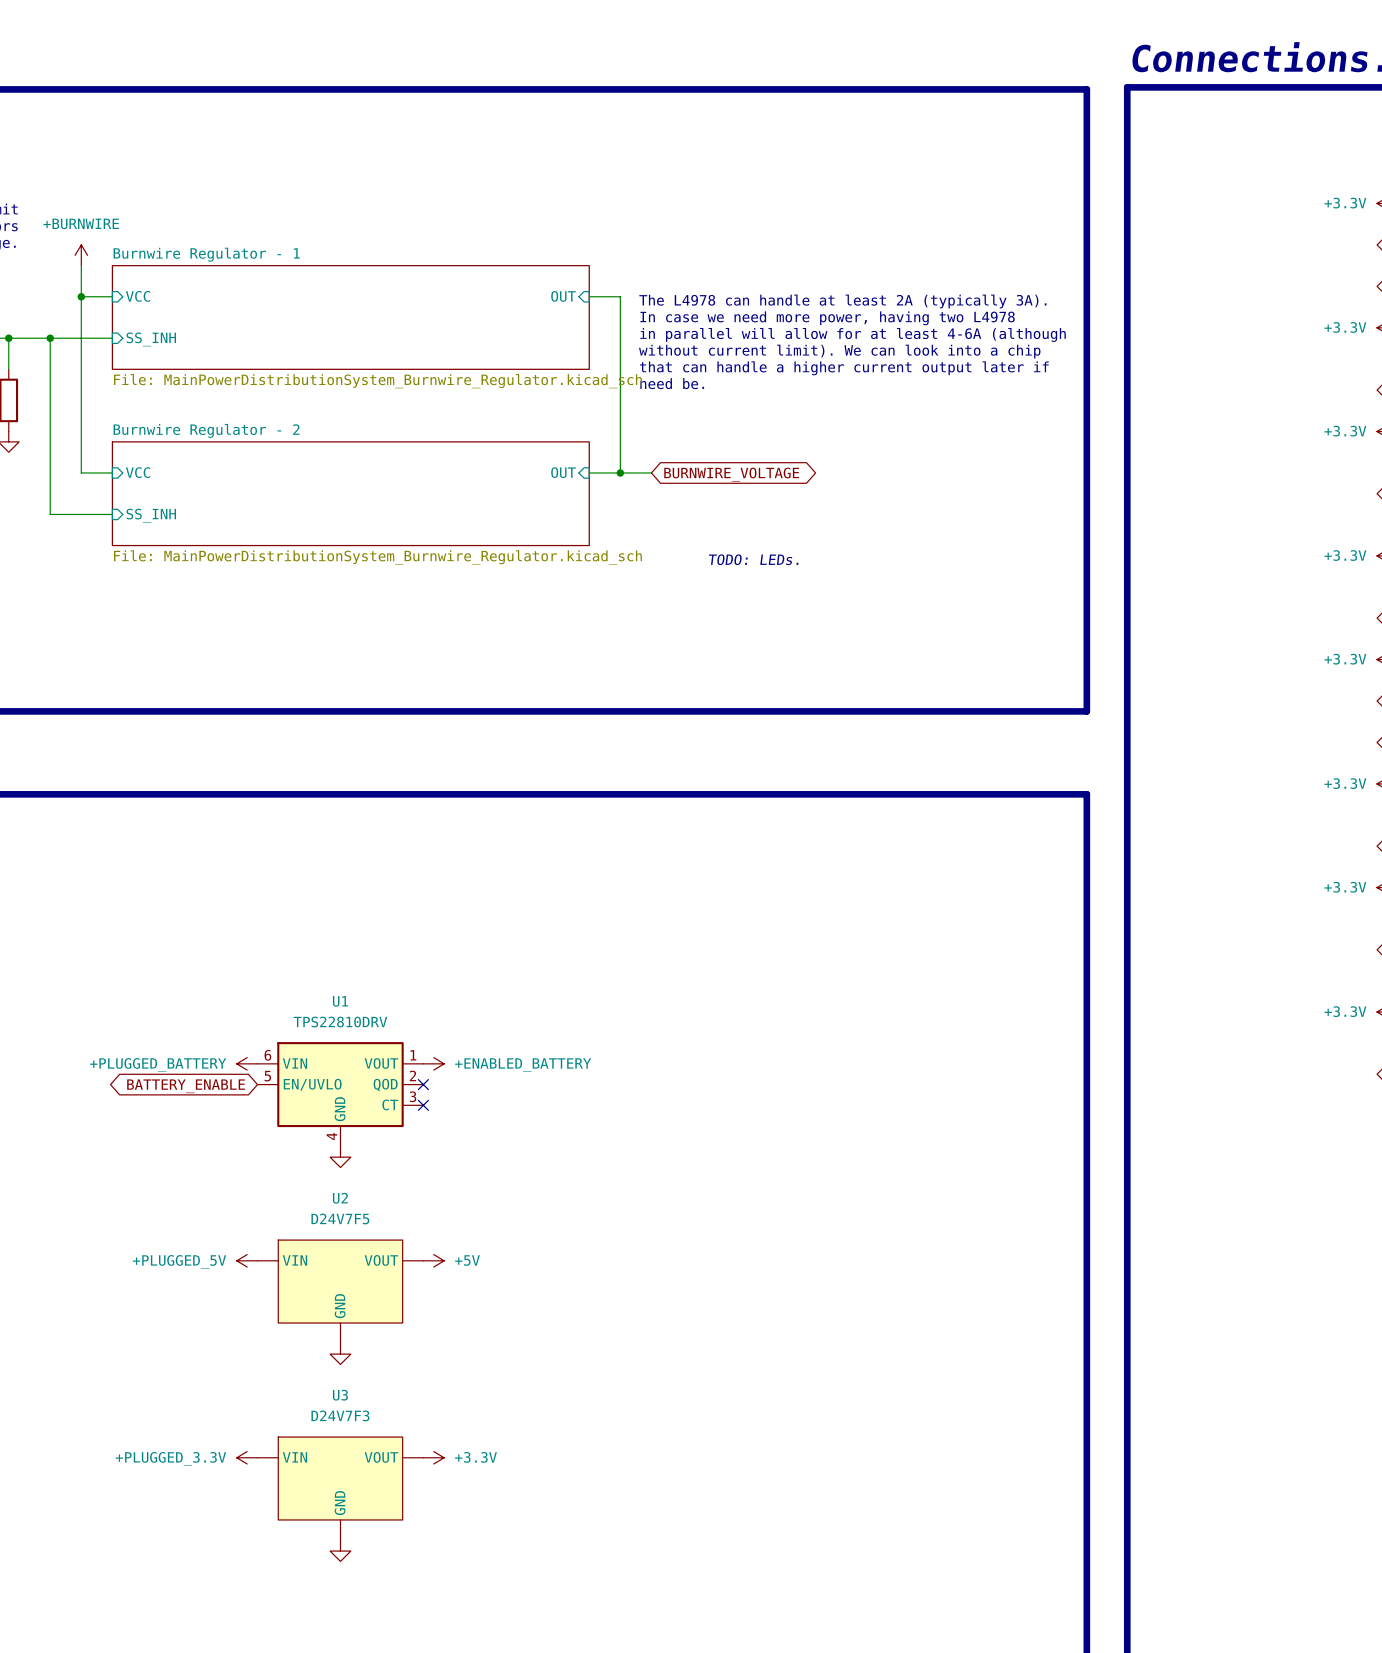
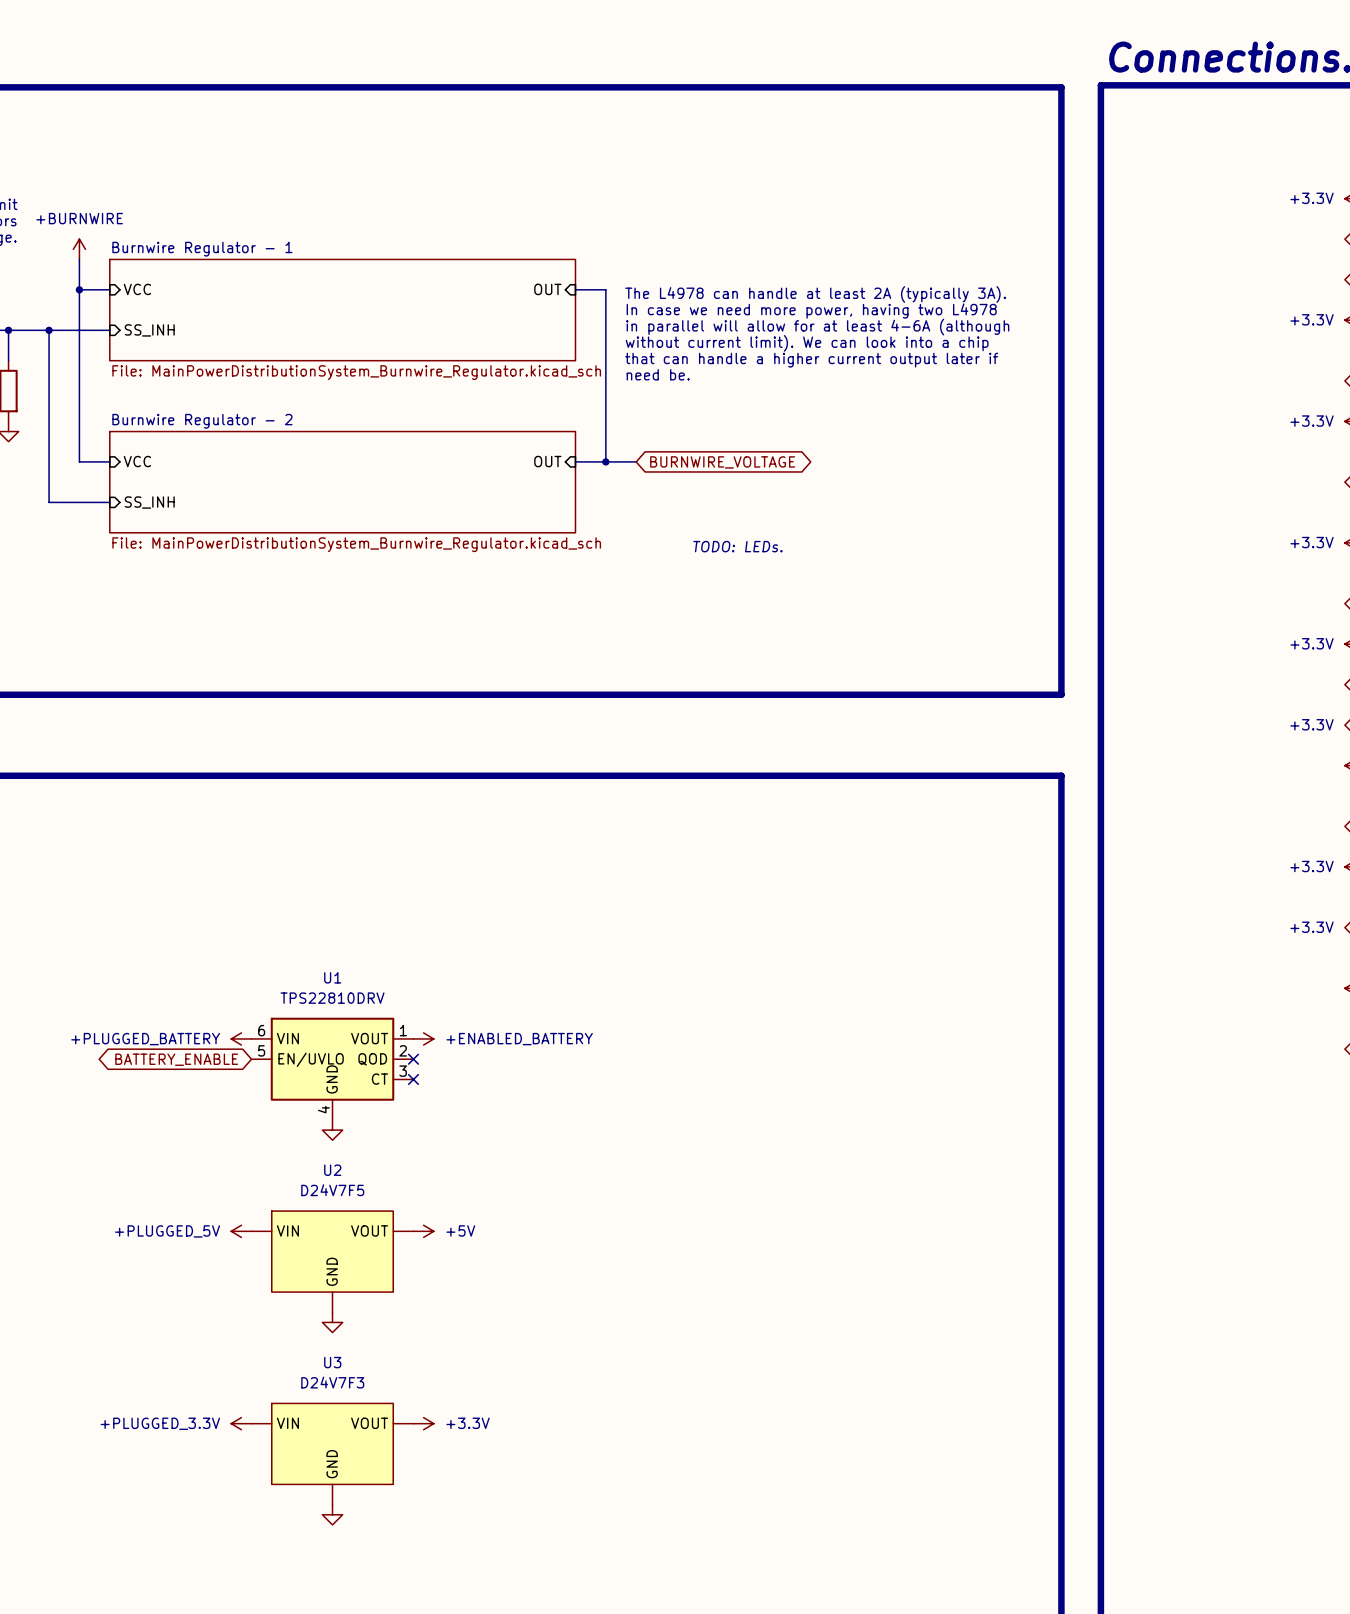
power symbol text: none -> +3.3V (1312, 724)
power symbol text: +3.3V (1345, 783) -> none
power symbol text: none -> +3.3V (1312, 927)
power symbol text: +3.3V (1345, 1011) -> none

